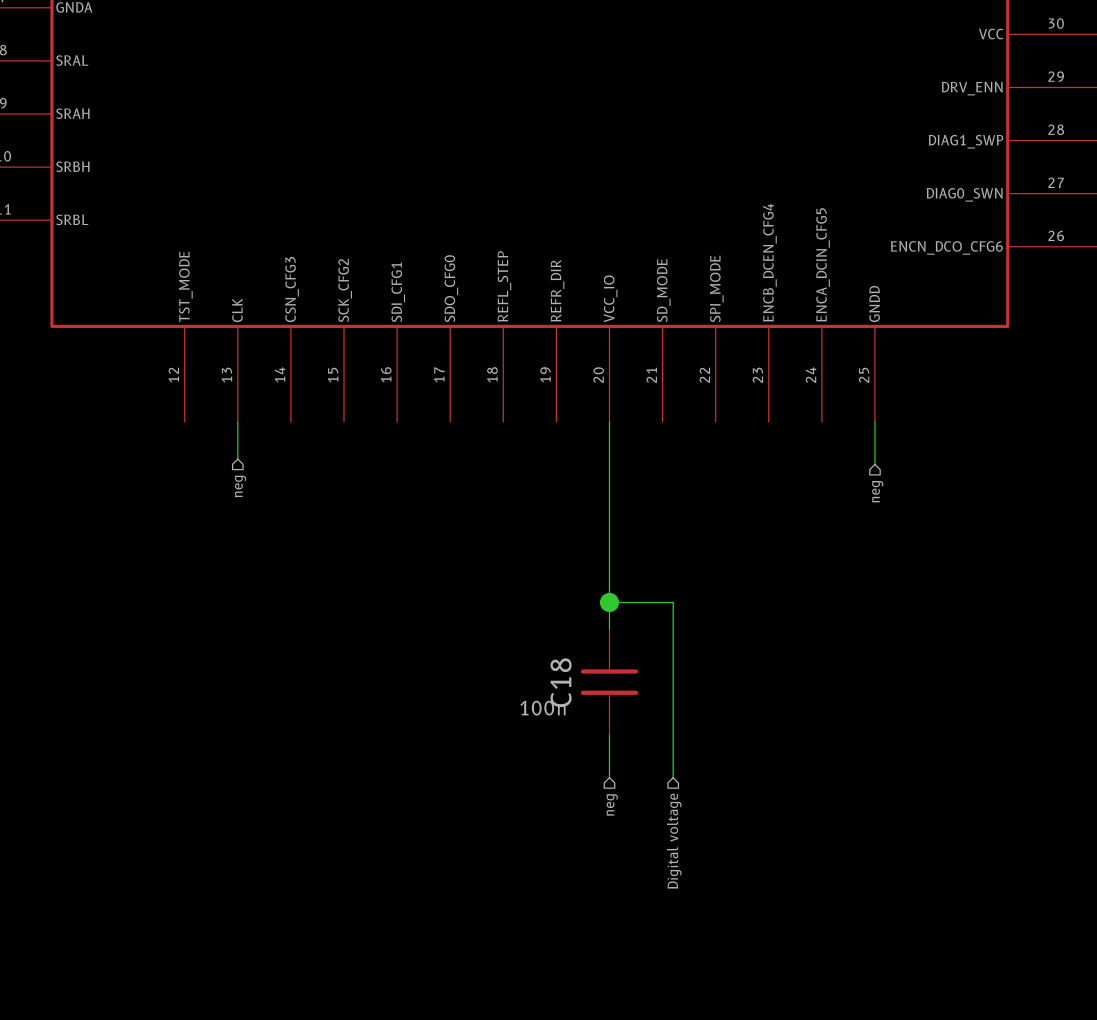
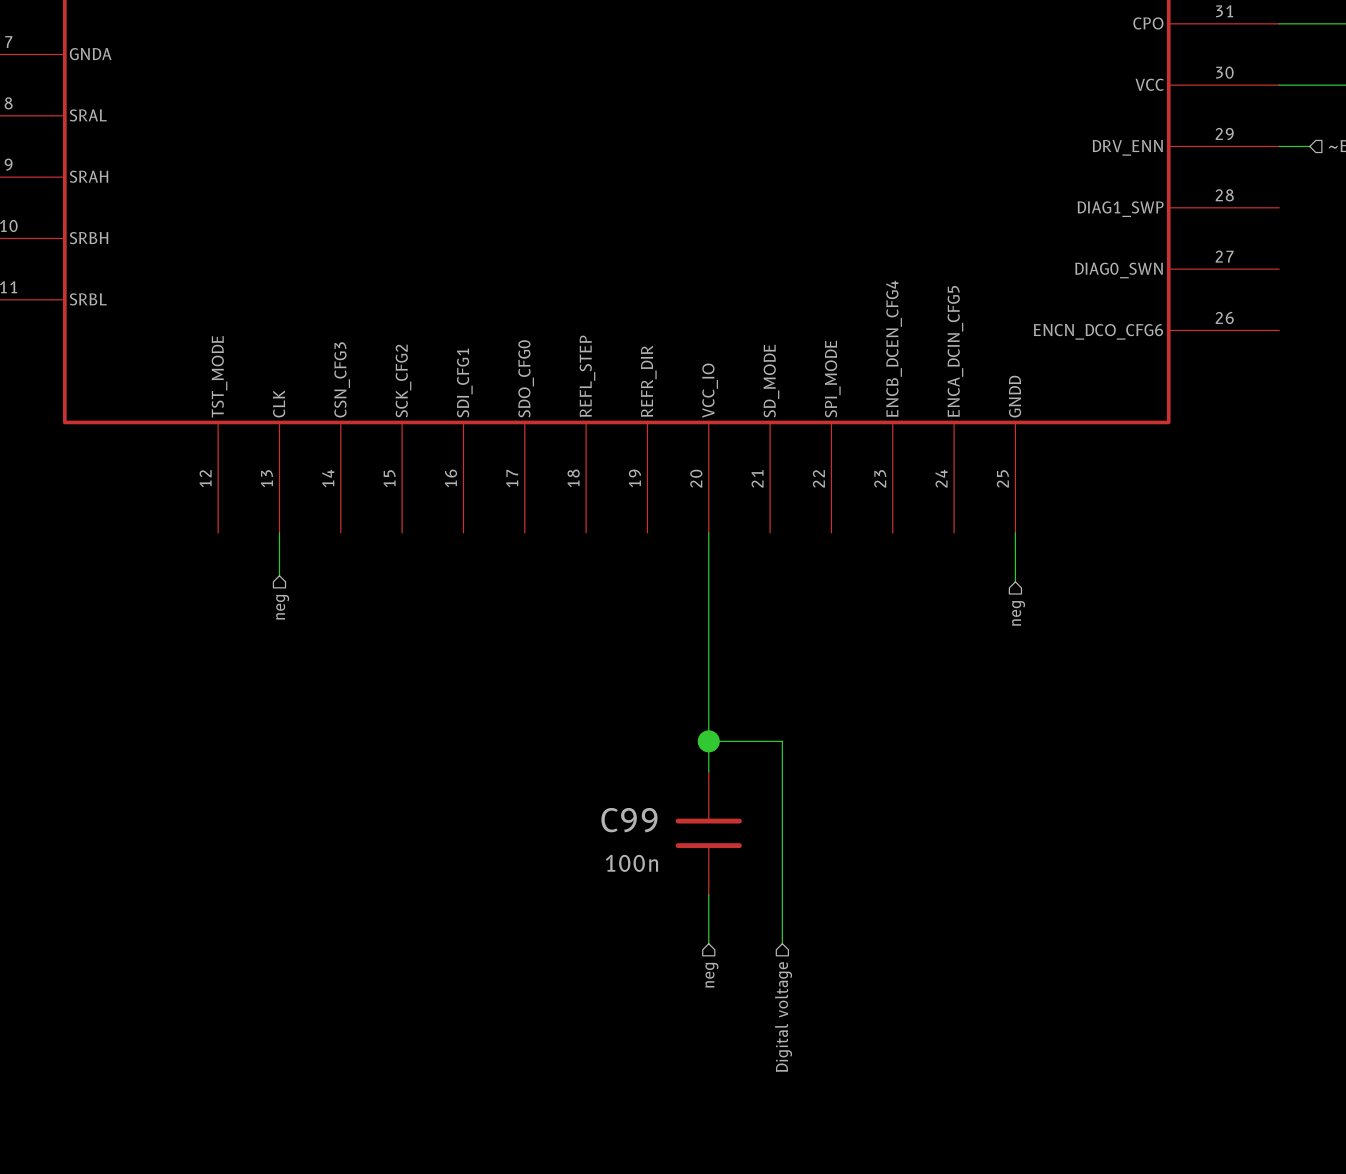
C18 name: C18 (561, 682) -> C99 (629, 820)

